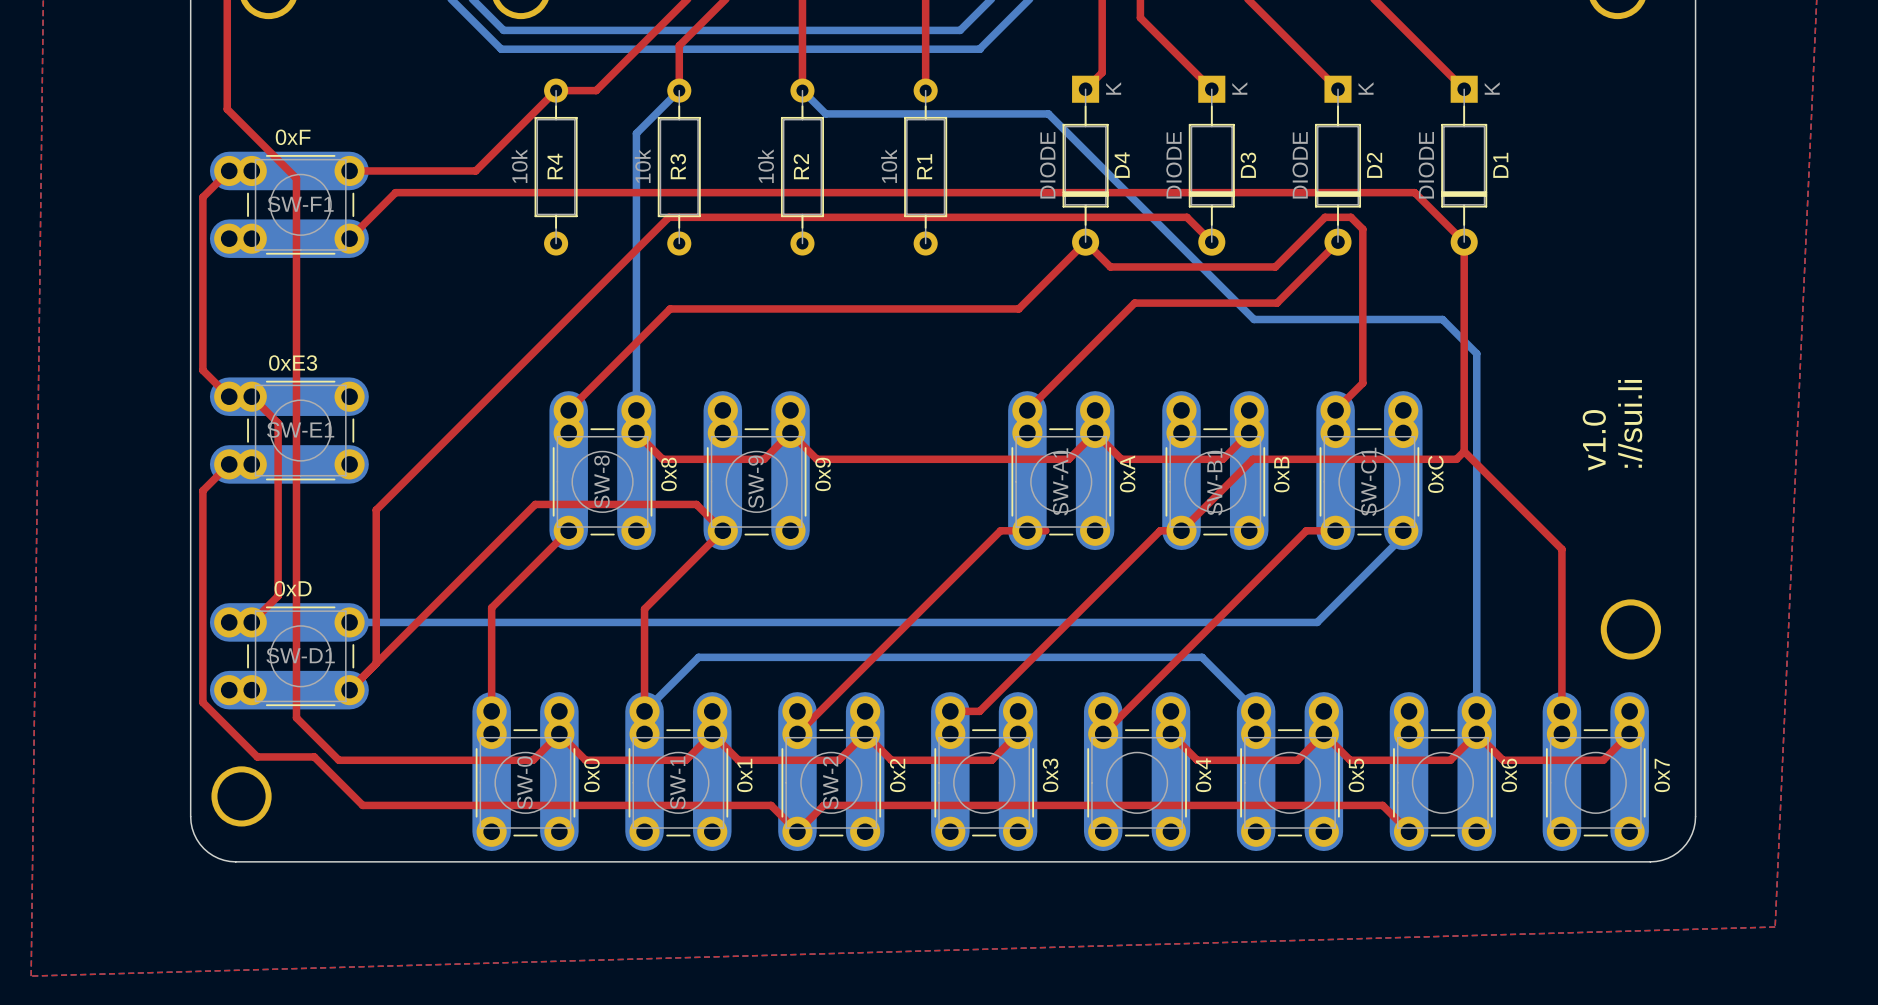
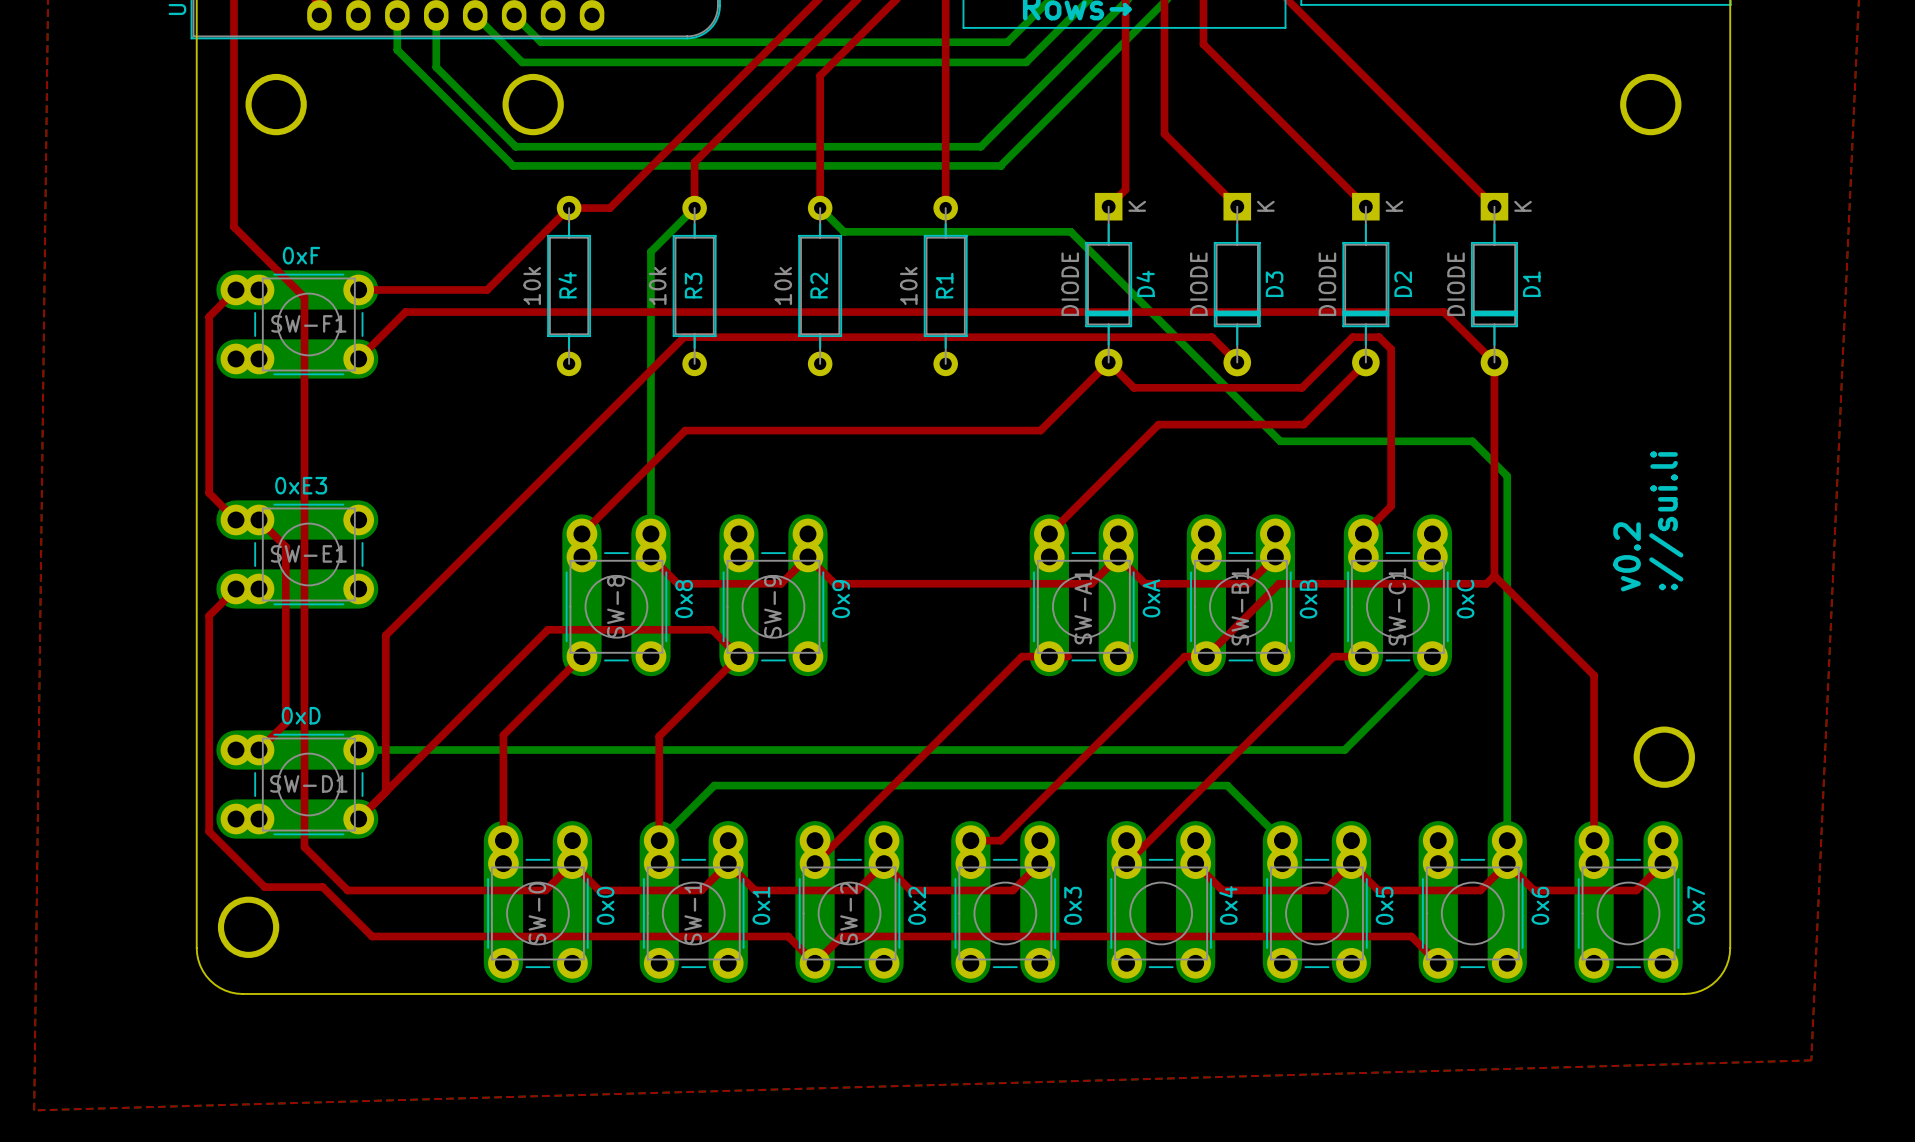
text: v1.0 (1594, 440) -> v0.2 (1627, 556)

